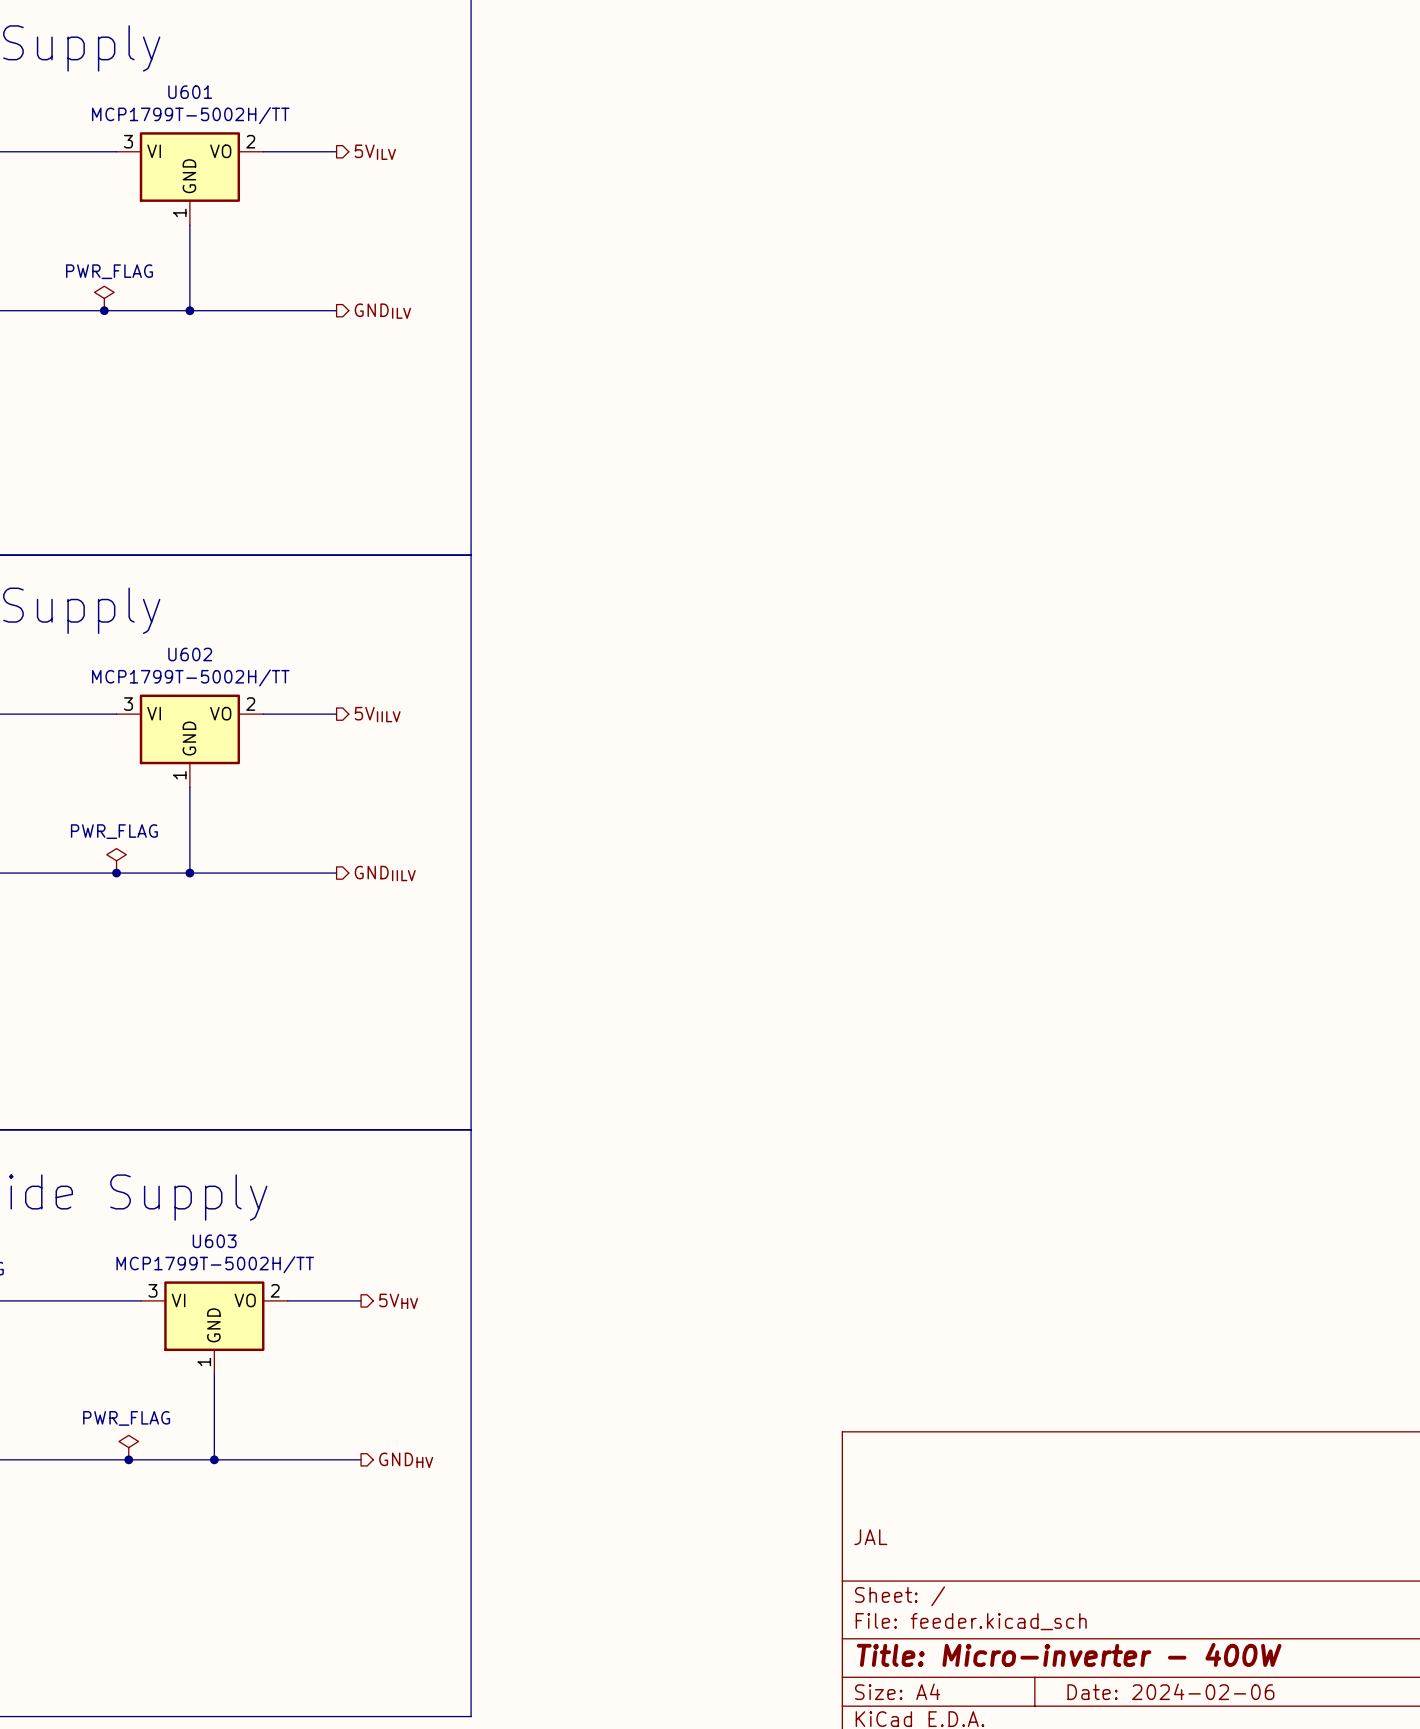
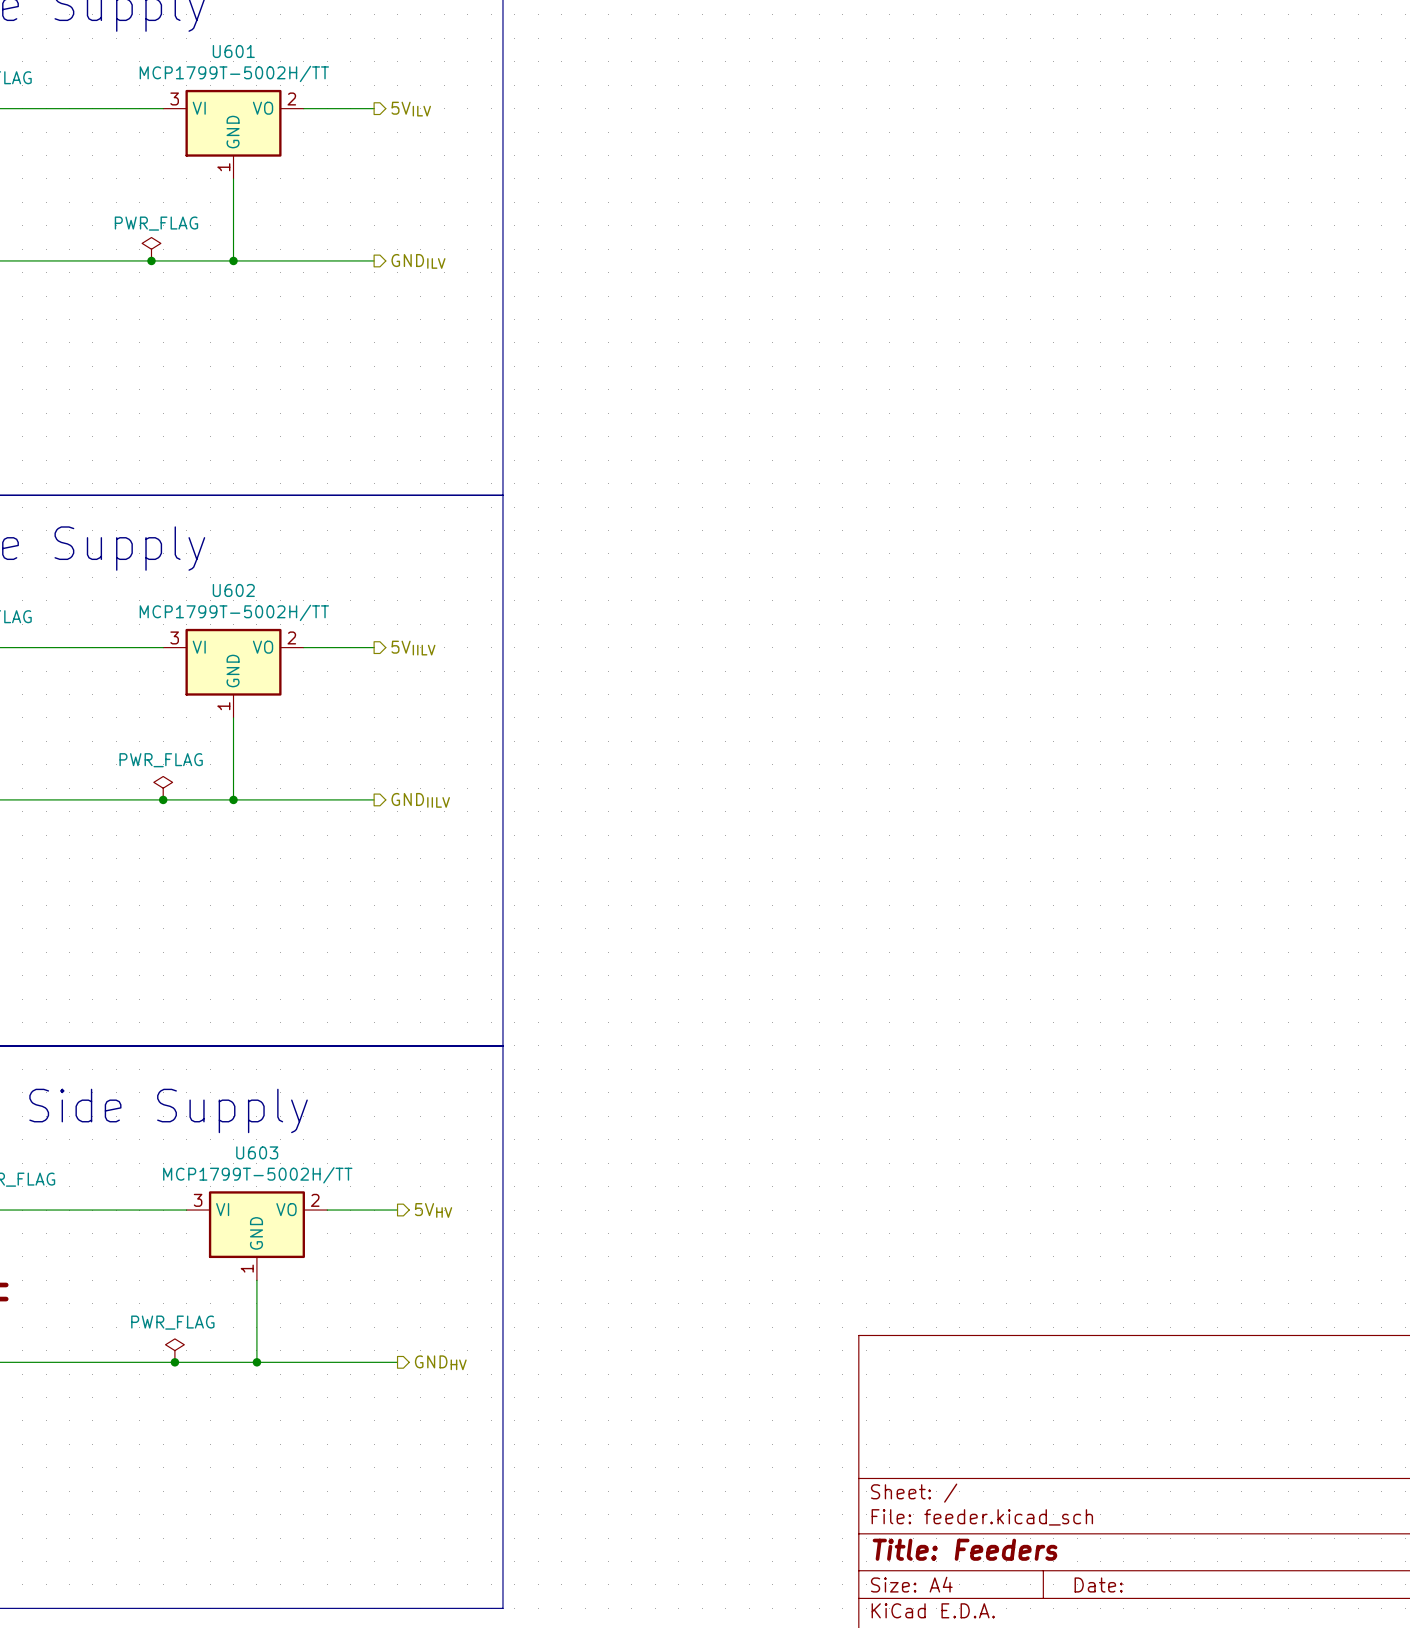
title block: JAL (870, 1537) -> none
title block: Title: Micro-inverter - 400W (1069, 1654) -> Title: Feeders (965, 1549)
title block: Date: 2024-02-06 (1170, 1691) -> Date: (1098, 1584)

